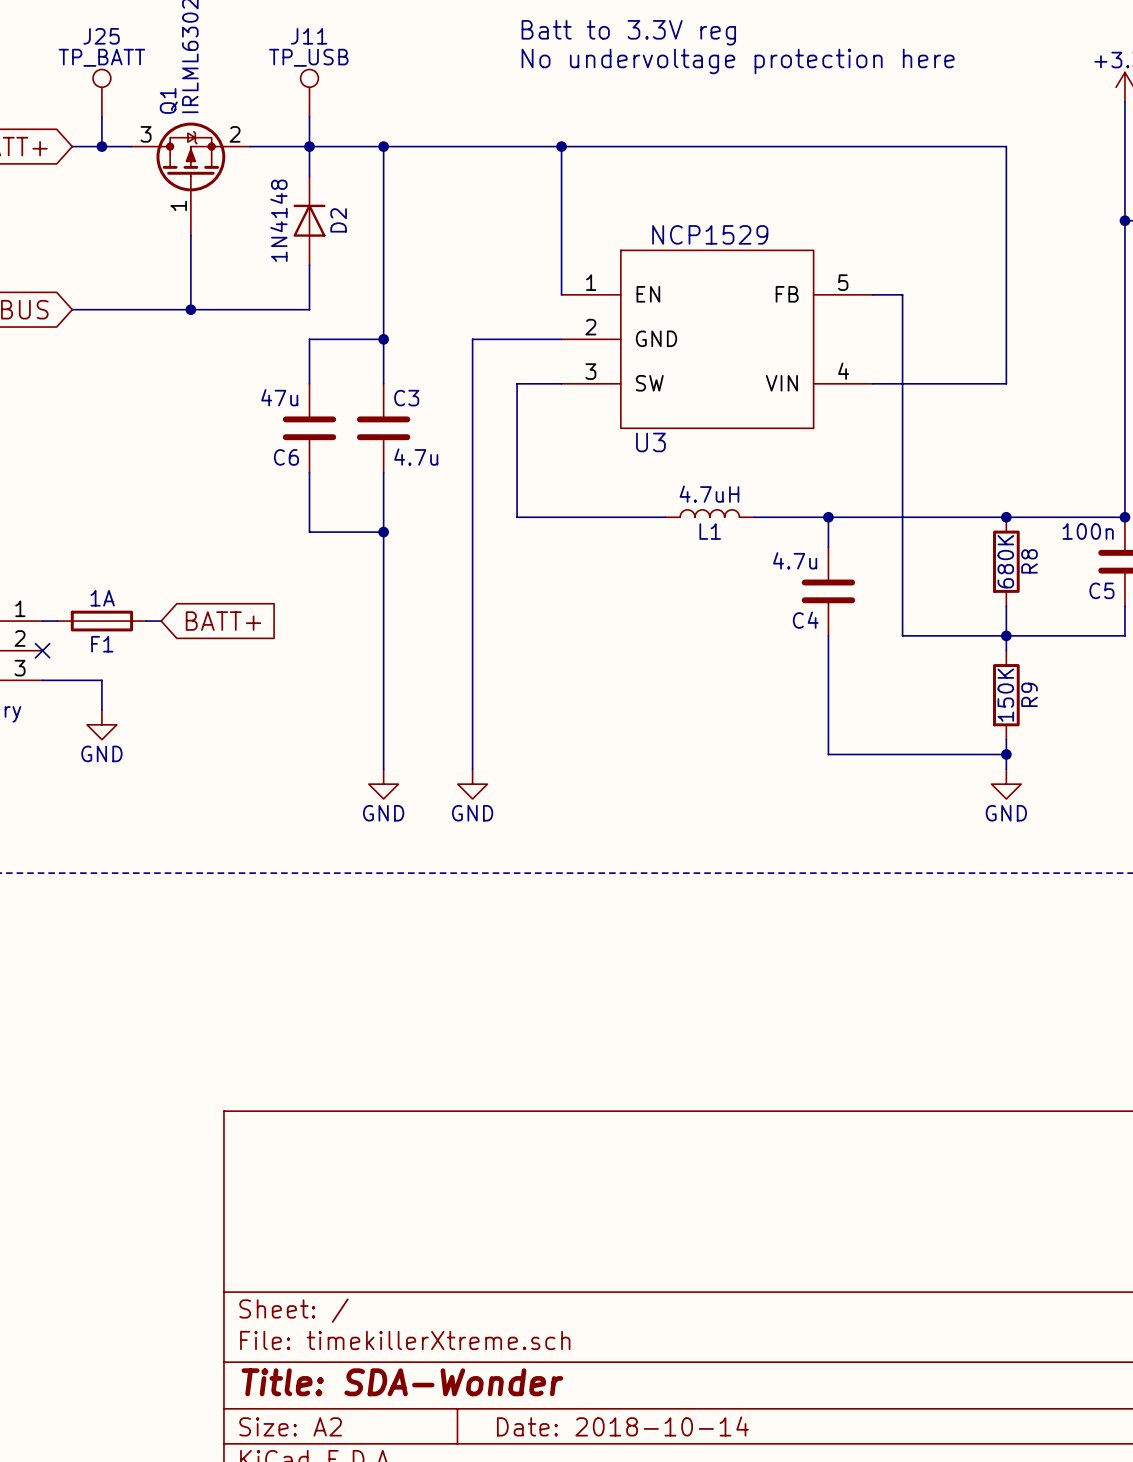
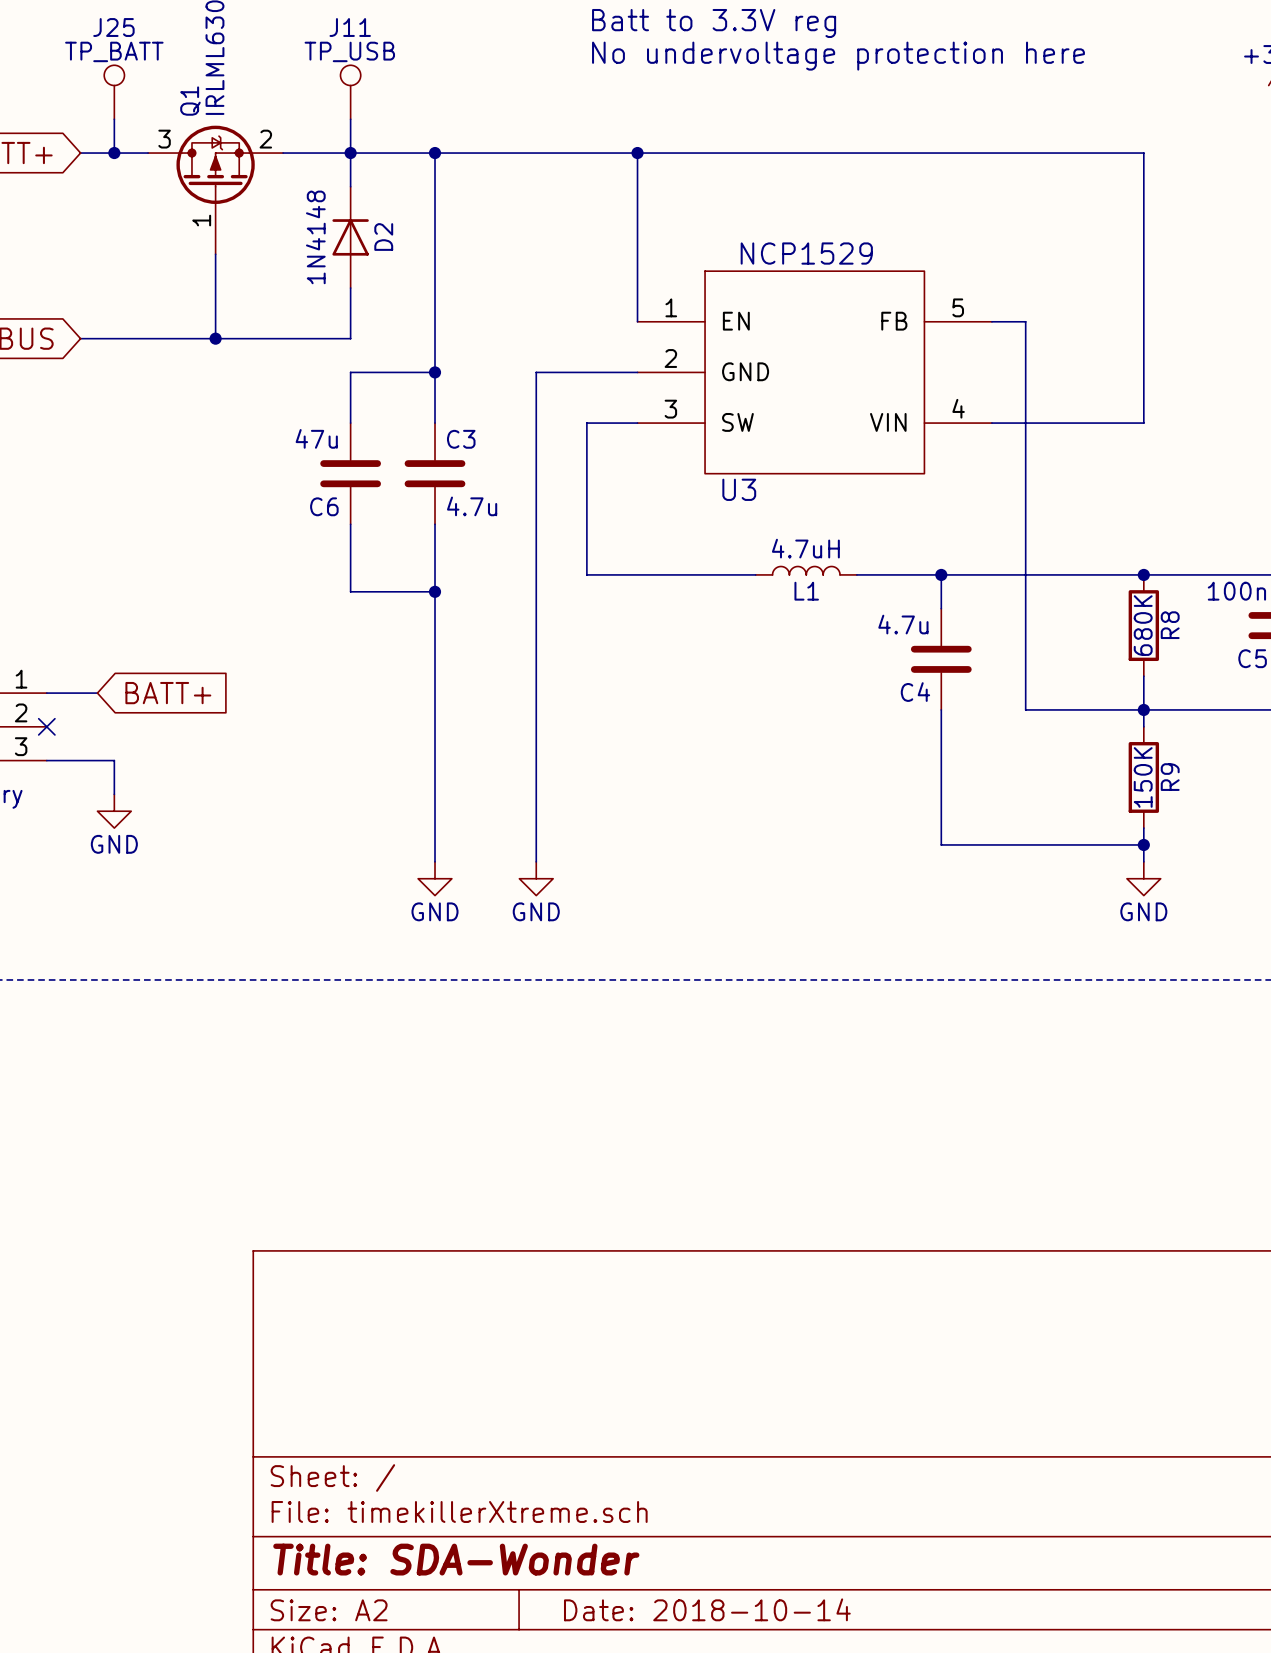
F1: 1A (101, 621) -> none
wire: (146, 621) (161, 621) -> none
global label position: BATT+ (223, 621) -> BATT+ (168, 693)

